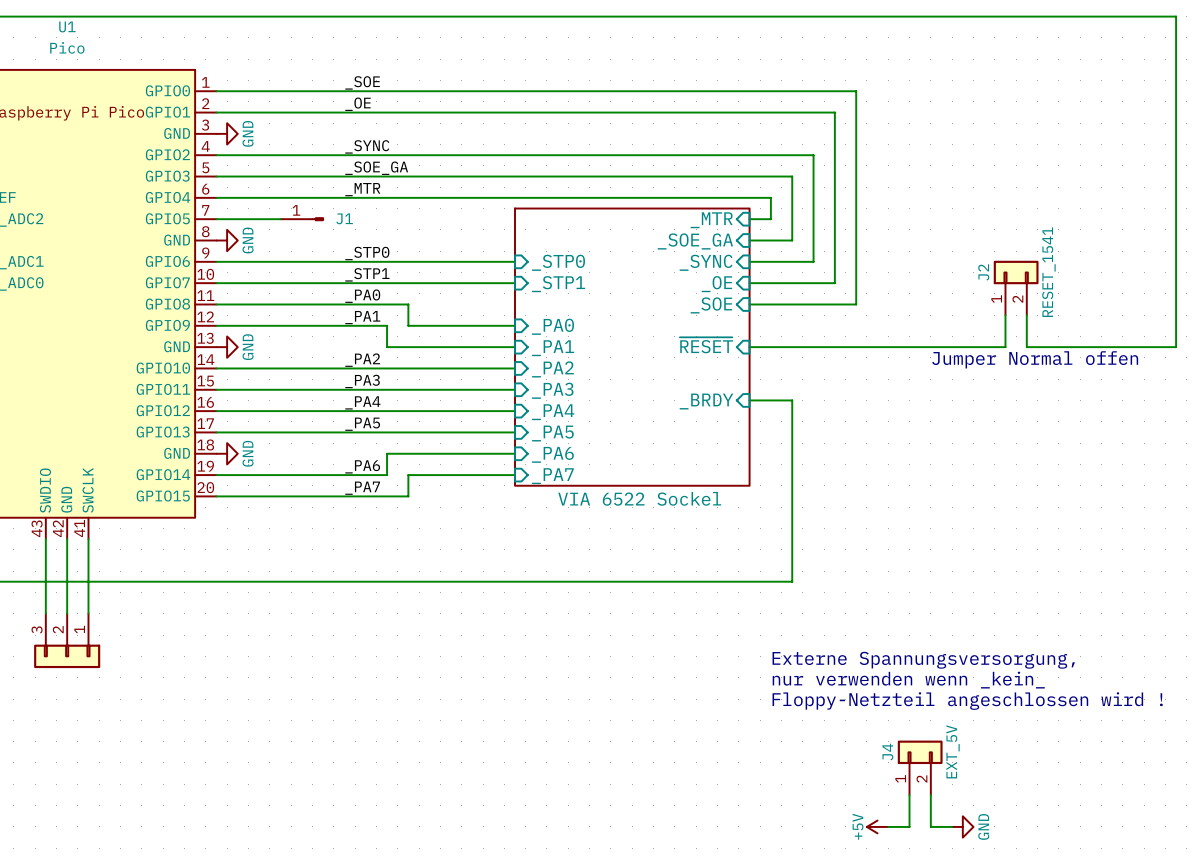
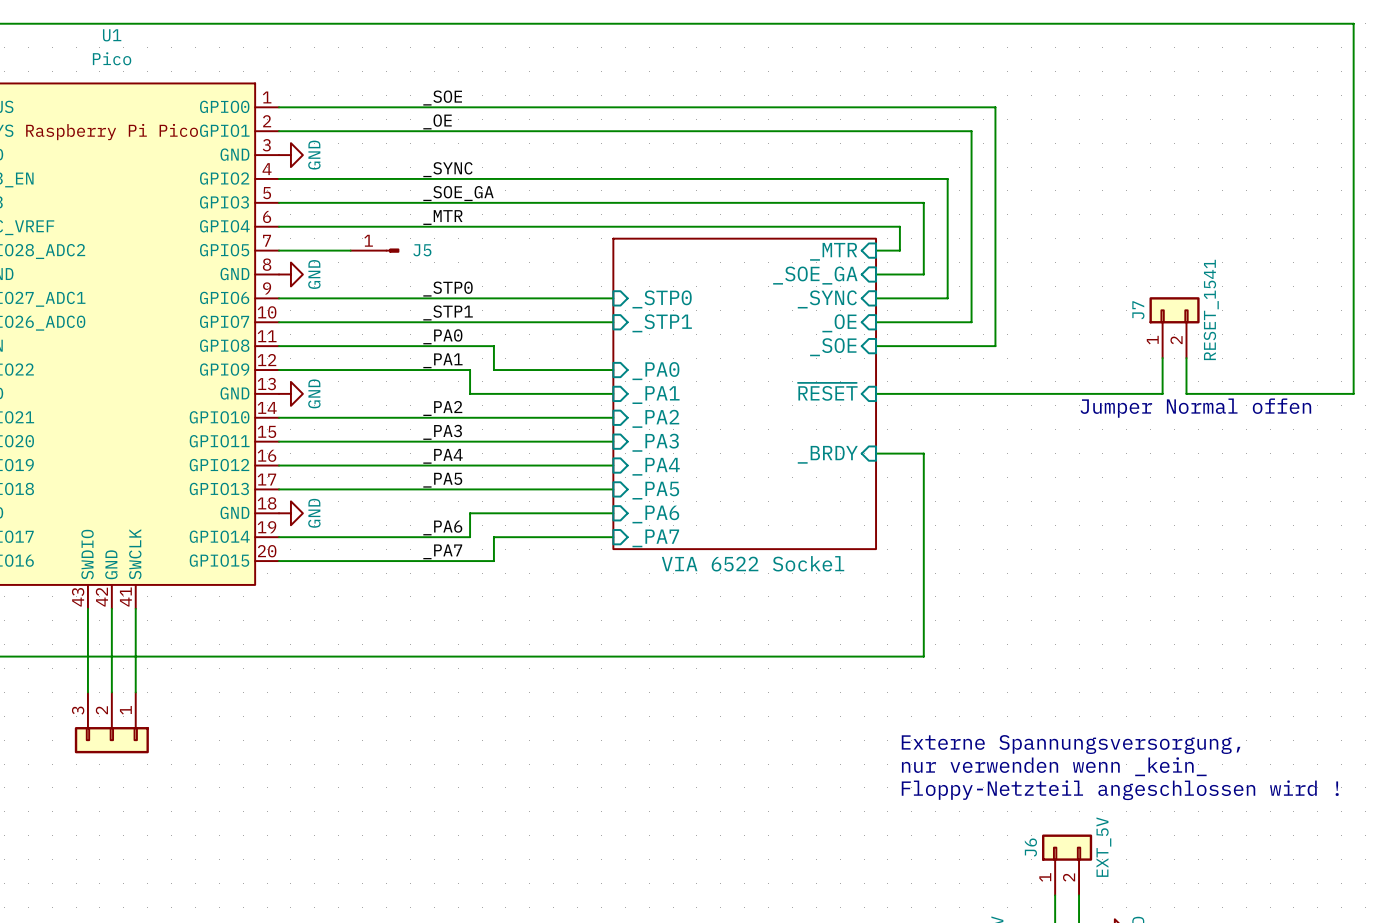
J1 name: J1 (344, 218) -> J5 (422, 250)
J2 name: J2 (983, 272) -> J7 (1138, 310)
J4 name: J4 (887, 752) -> J6 (1030, 847)

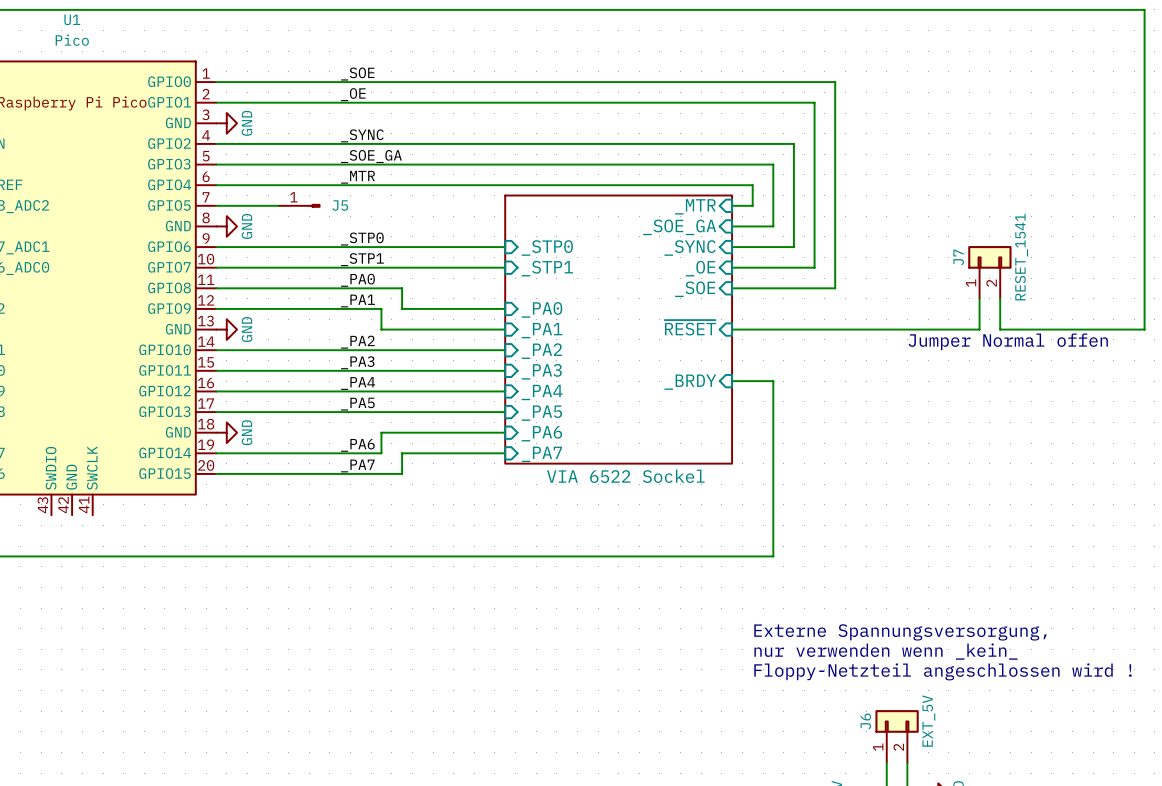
wire: (87, 608) (87, 692) -> none
wire: (111, 608) (111, 692) -> none
wire: (135, 608) (135, 692) -> none
part: (111, 722) -> none

